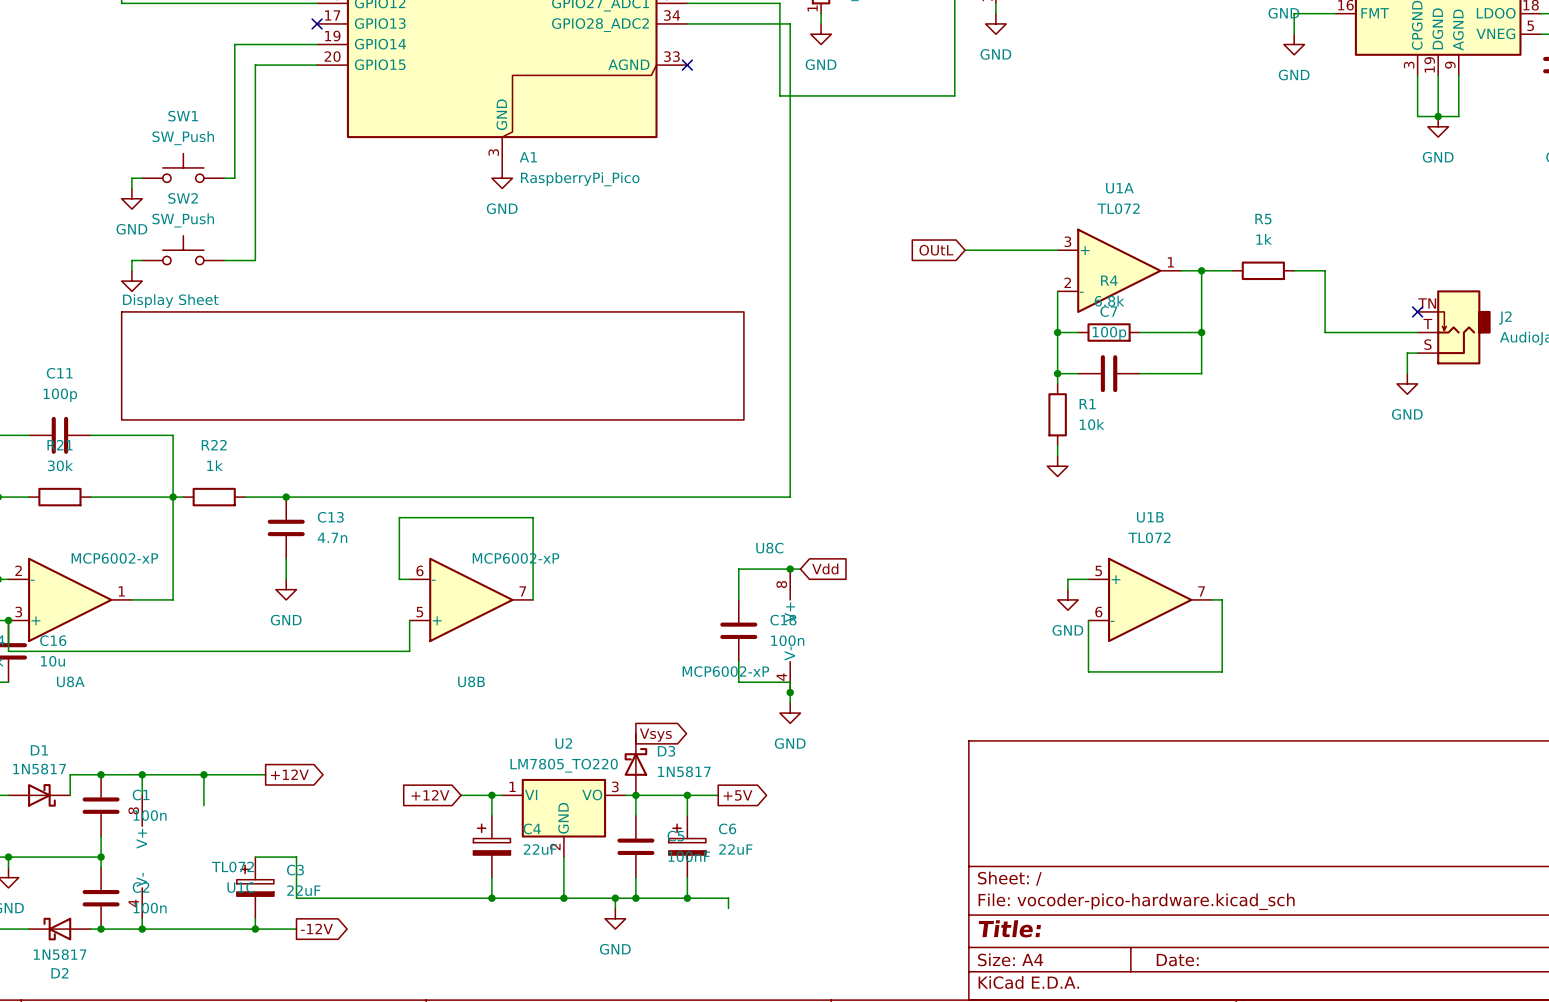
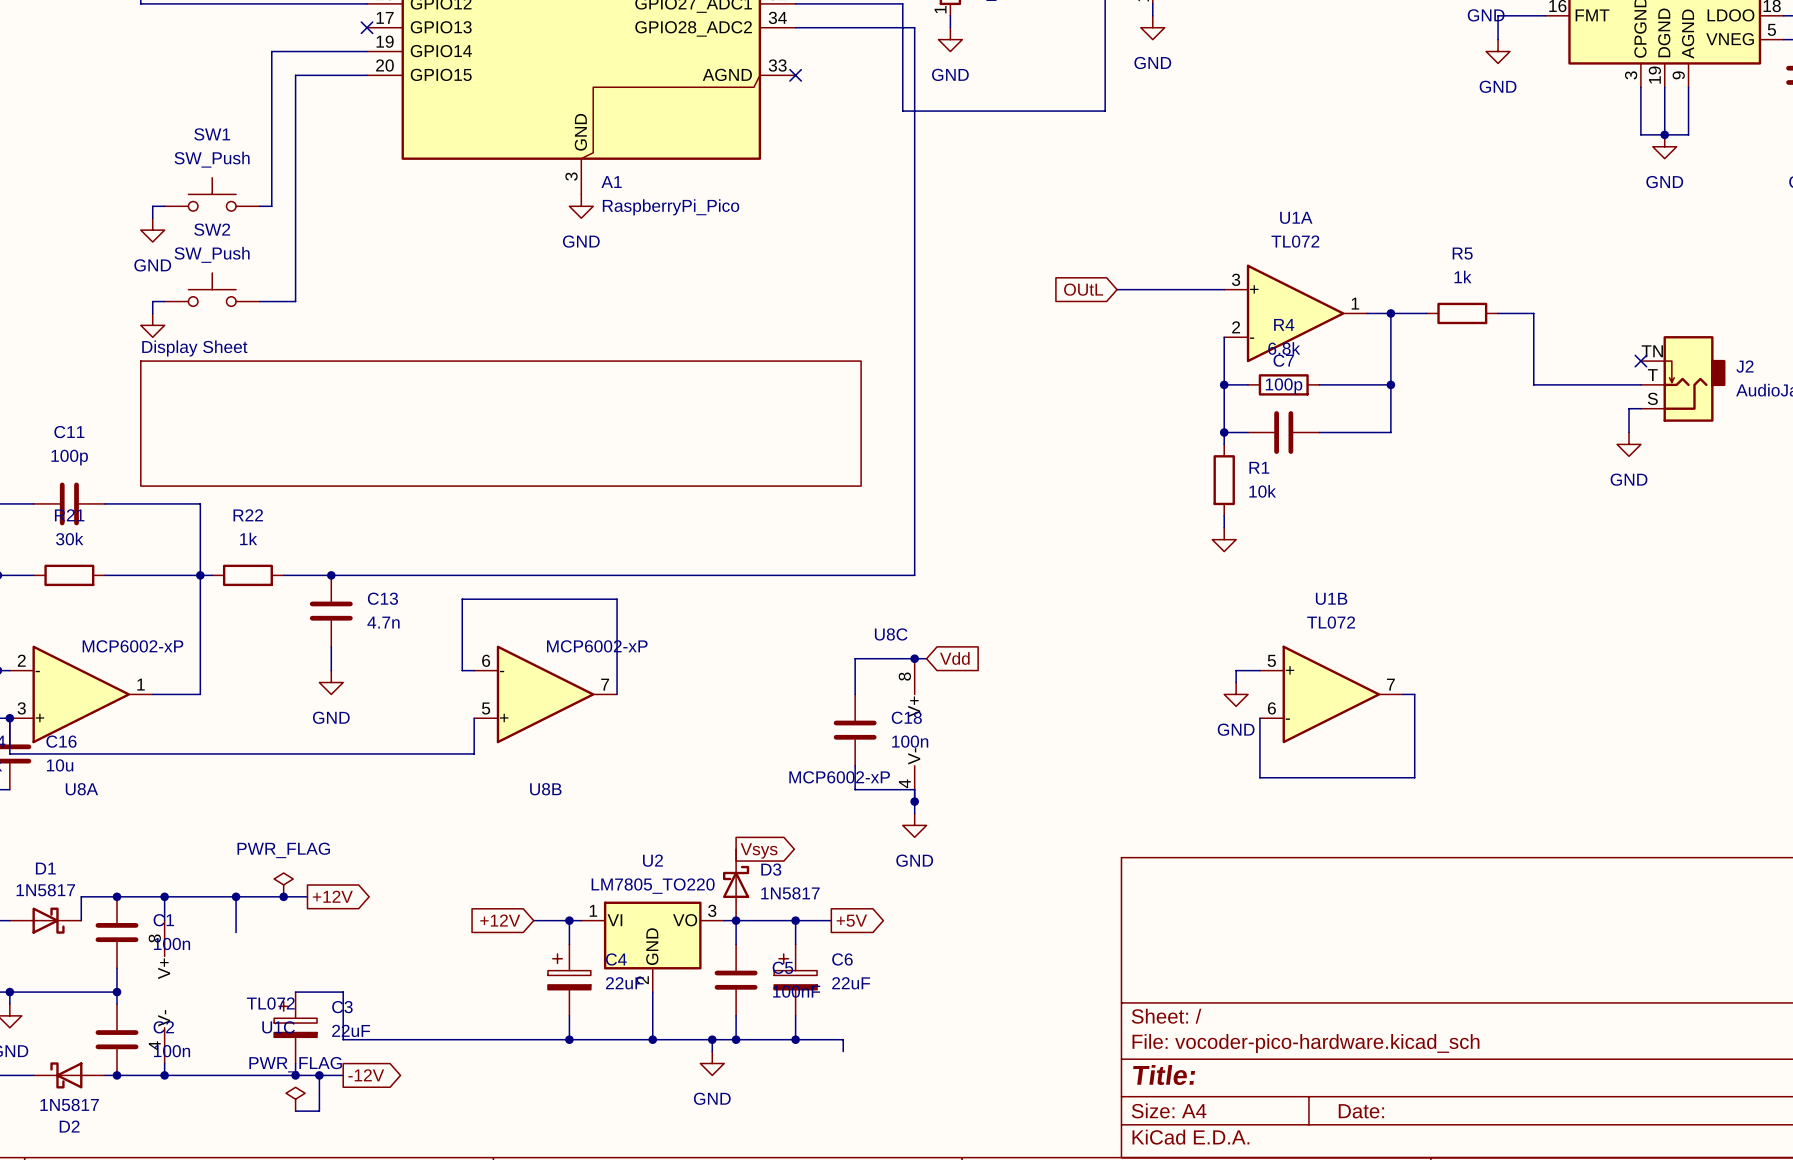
power symbol: none -> PWR_FLAG (283, 884)
junction: none -> (283, 896)
wire: none -> (319, 1075) (319, 1111) (295, 1111)
junction: none -> (319, 1075)
power symbol: none -> PWR_FLAG (295, 1099)

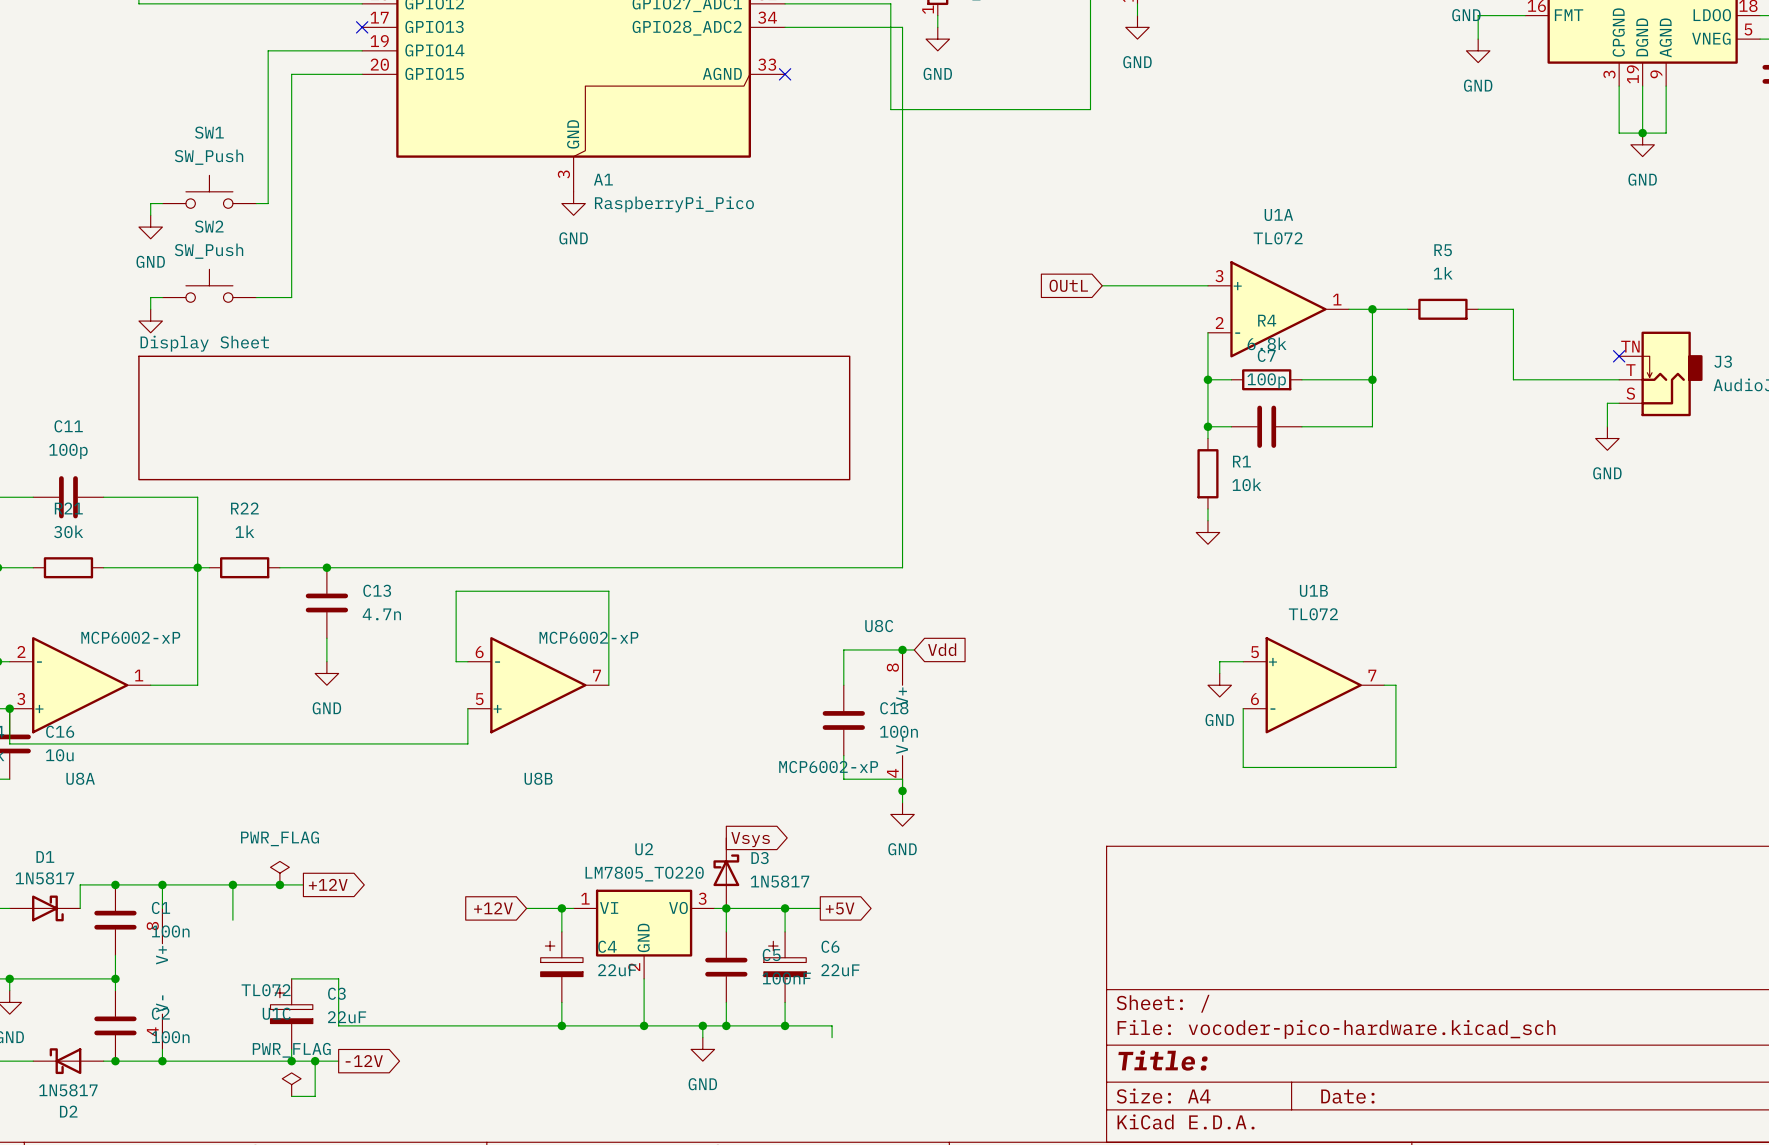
J2 name: J2 (1744, 366) -> J3 (1723, 361)

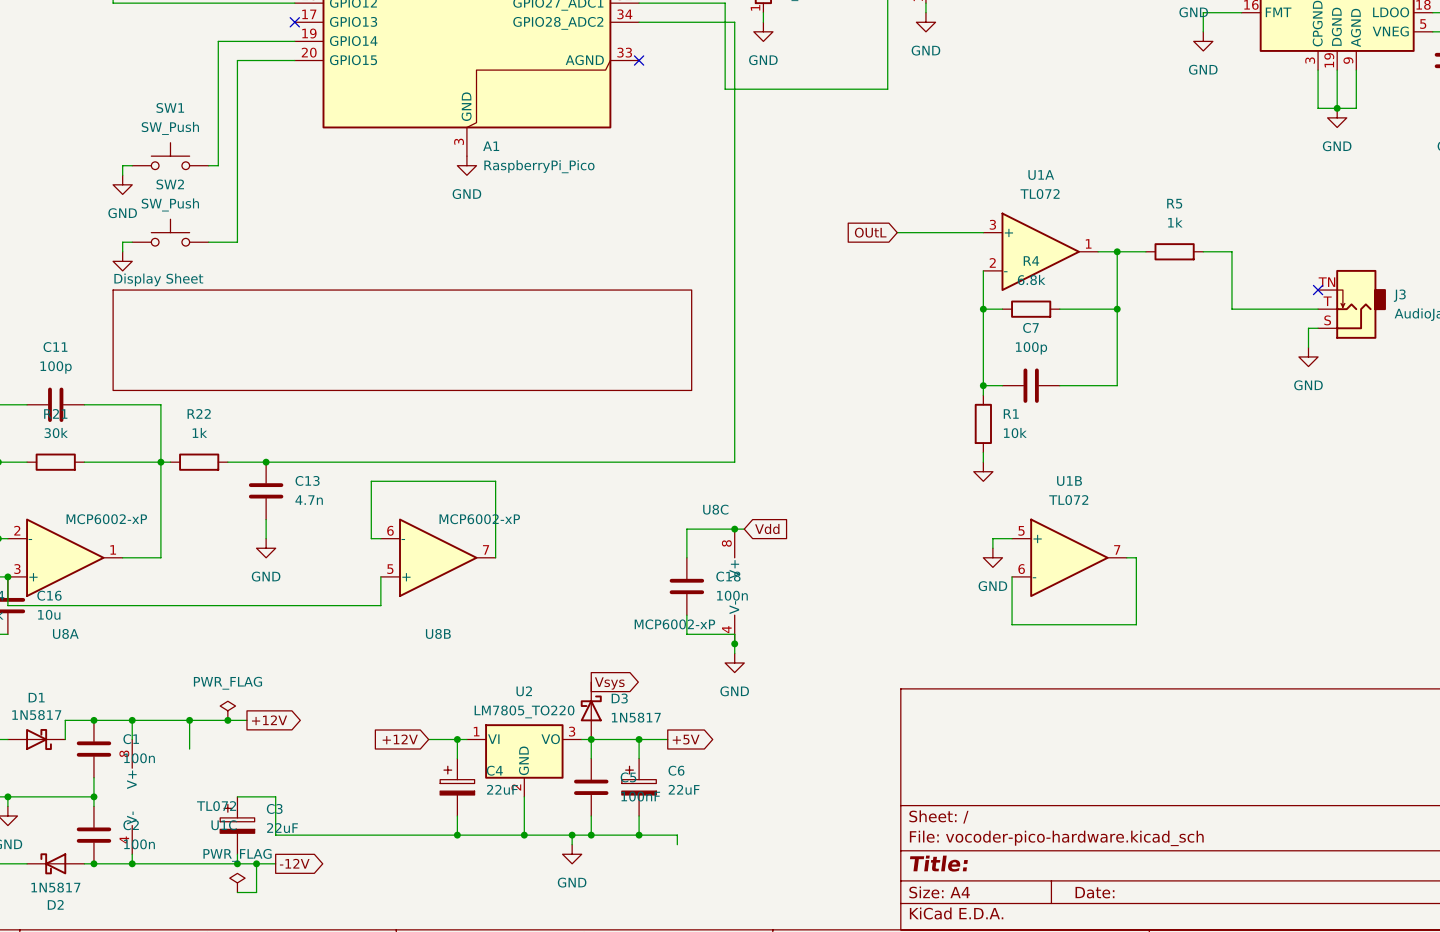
wire: (1207, 426) (1231, 426) -> (983, 385) (1002, 385)
junction position: (1207, 426) -> (983, 385)
C7 position: (1266, 426) -> (1031, 385)
wire: (1301, 426) (1372, 426) -> (1059, 385) (1117, 385) (1117, 347)
wire: none -> (983, 356) (983, 395)
R1 position: (1207, 473) -> (983, 423)
wire: (1207, 509) (1207, 520) -> (983, 452) (983, 462)
power symbol position: (1207, 532) -> (983, 471)

